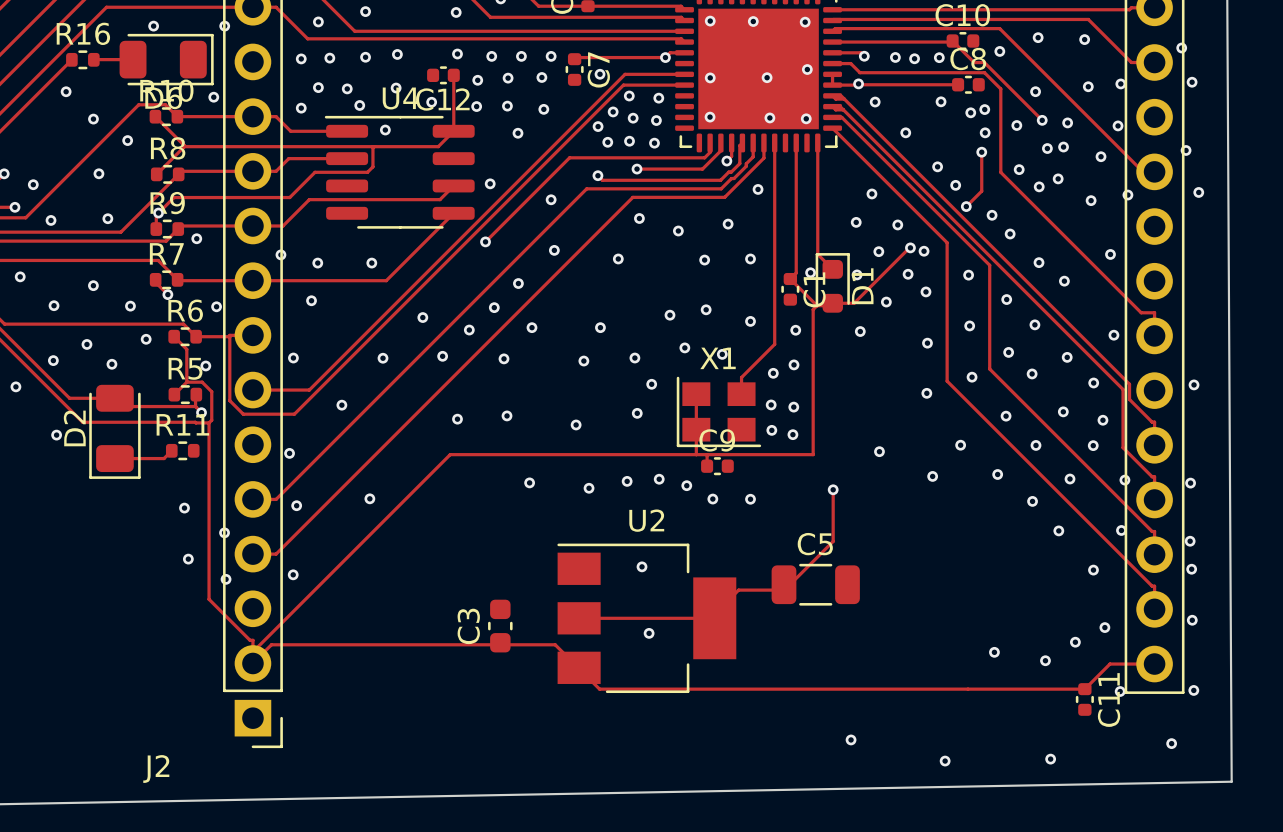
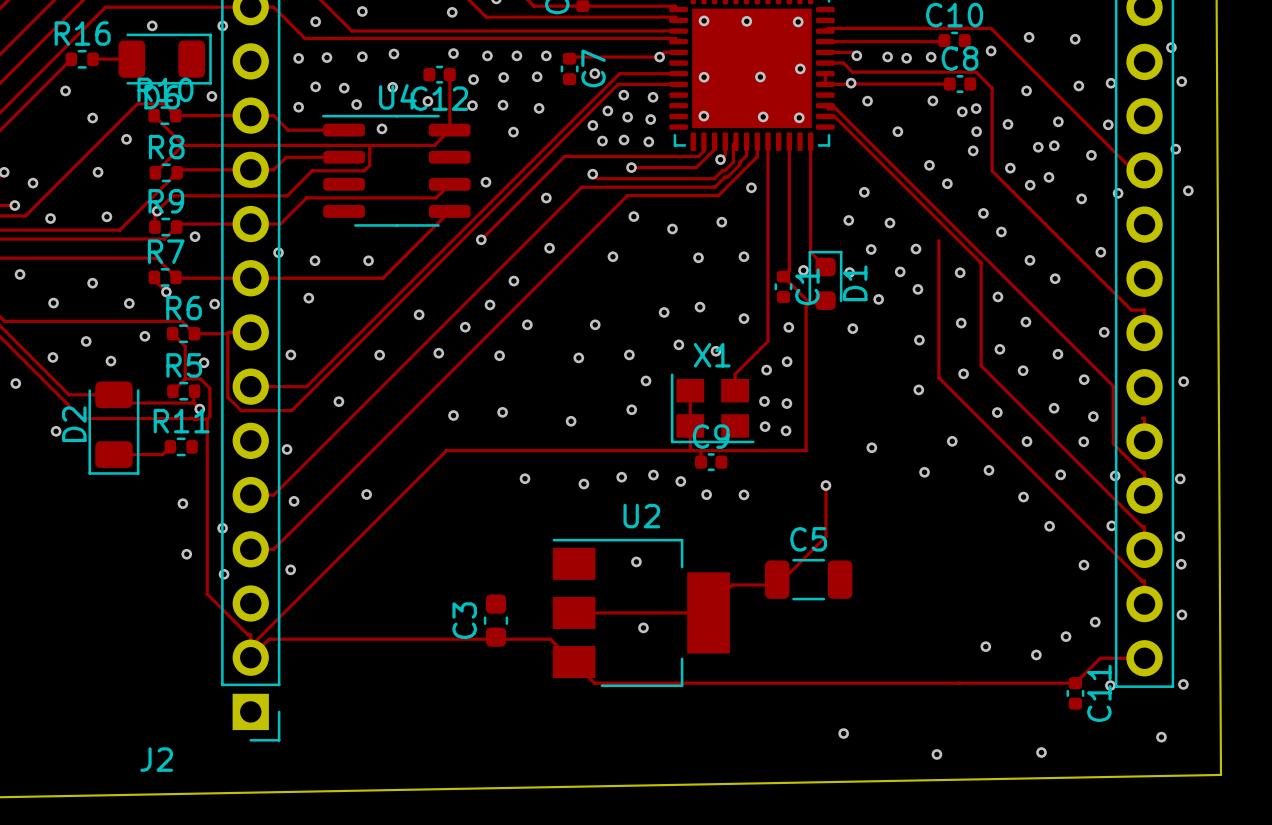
track: (1154, 7) (1131, 7) (1129, 9) (832, 9) -> none
track: (833, 19) (1088, 19) (1131, 62) (1154, 62) -> none
track: (952, 41) (974, 62) (984, 62) (1042, 120) -> none
track: (832, 95) (835, 99) (844, 99) -> none
track: (841, 95) (1129, 384) (1129, 399) (1152, 422) -> none
via: (1042, 120) -> none
track: (832, 128) (947, 242) -> none
track: (981, 152) (981, 191) (966, 206) -> none
via: (966, 206) -> none
track: (910, 247) (854, 303) (832, 303) -> none
via: (910, 247) -> none

